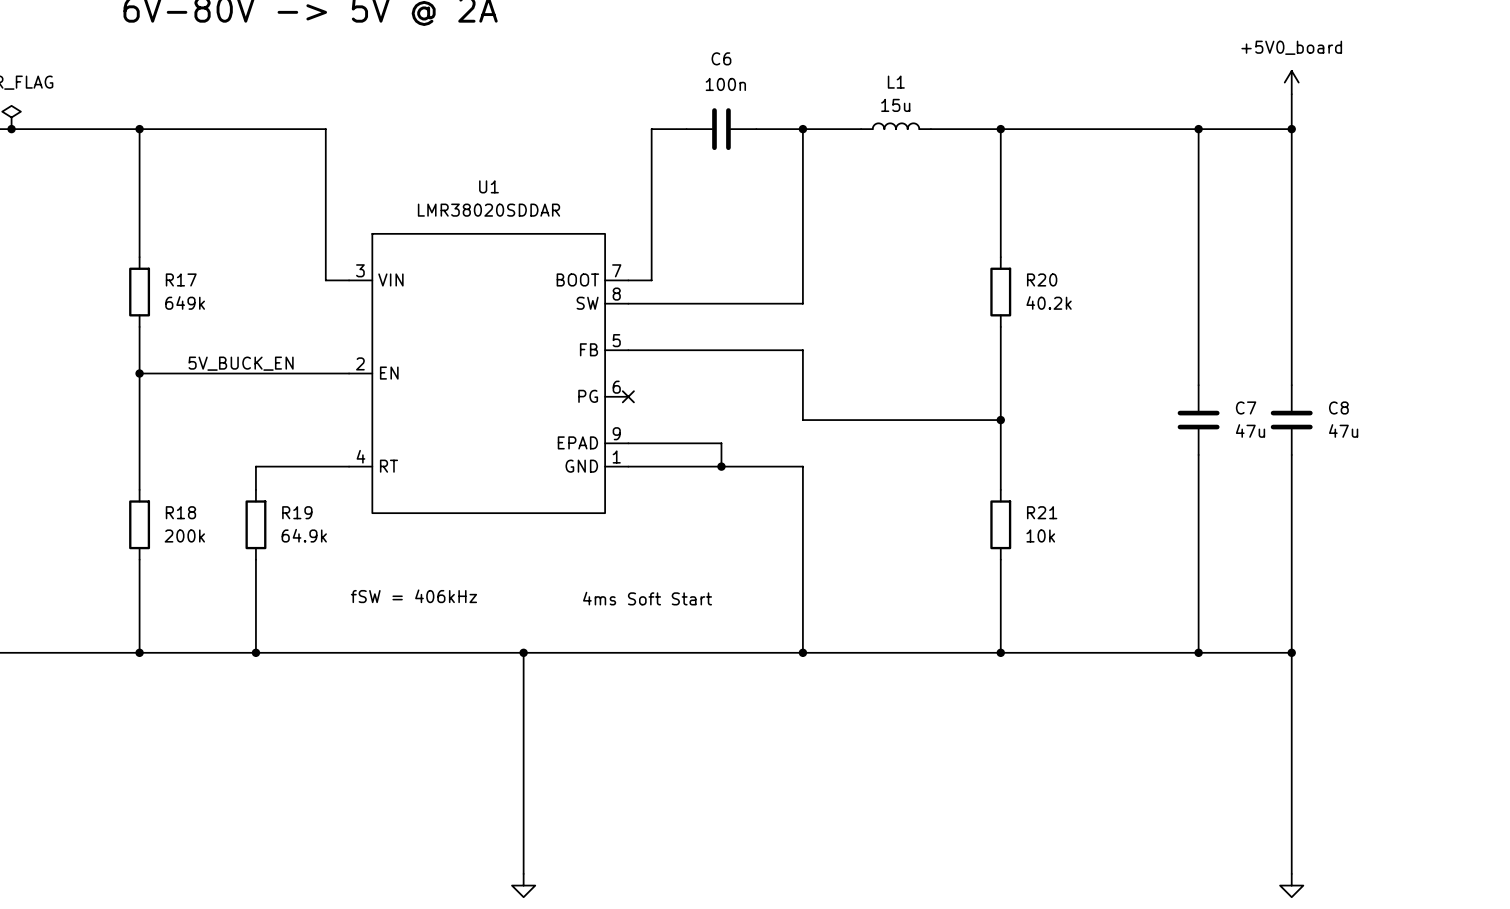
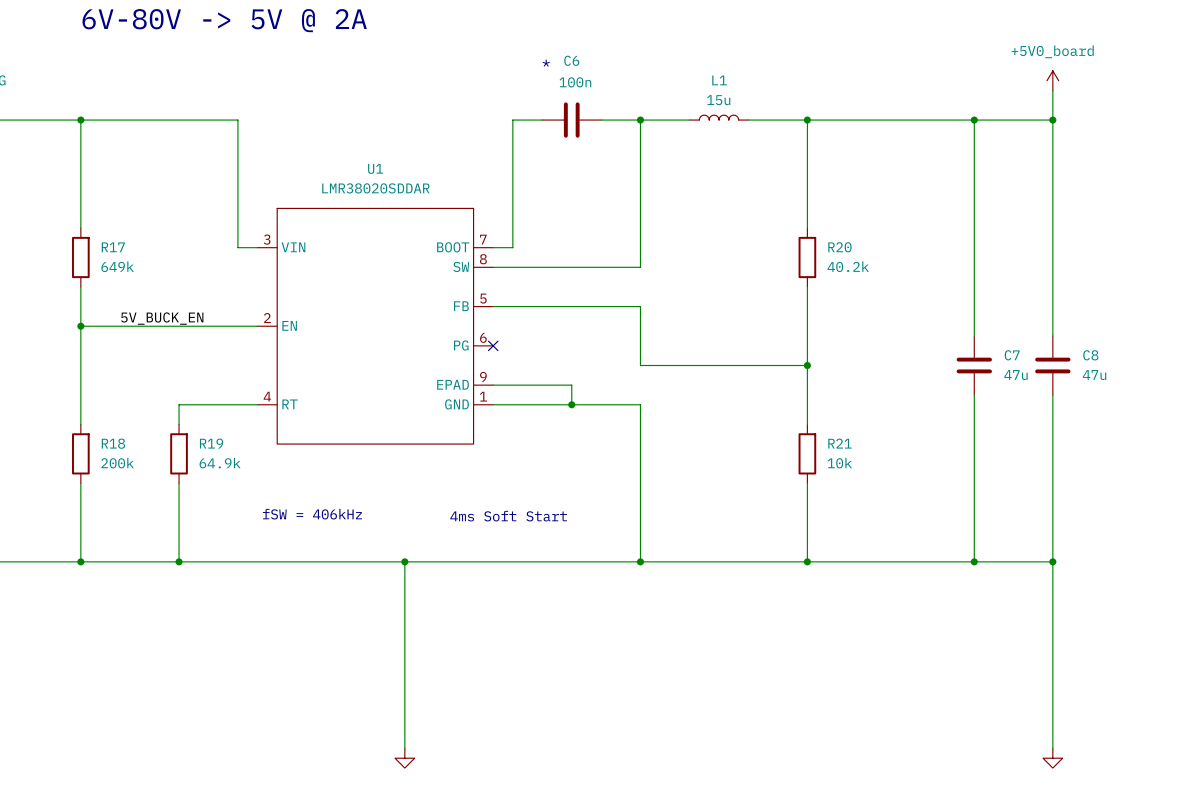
text: none -> * (546, 63)

